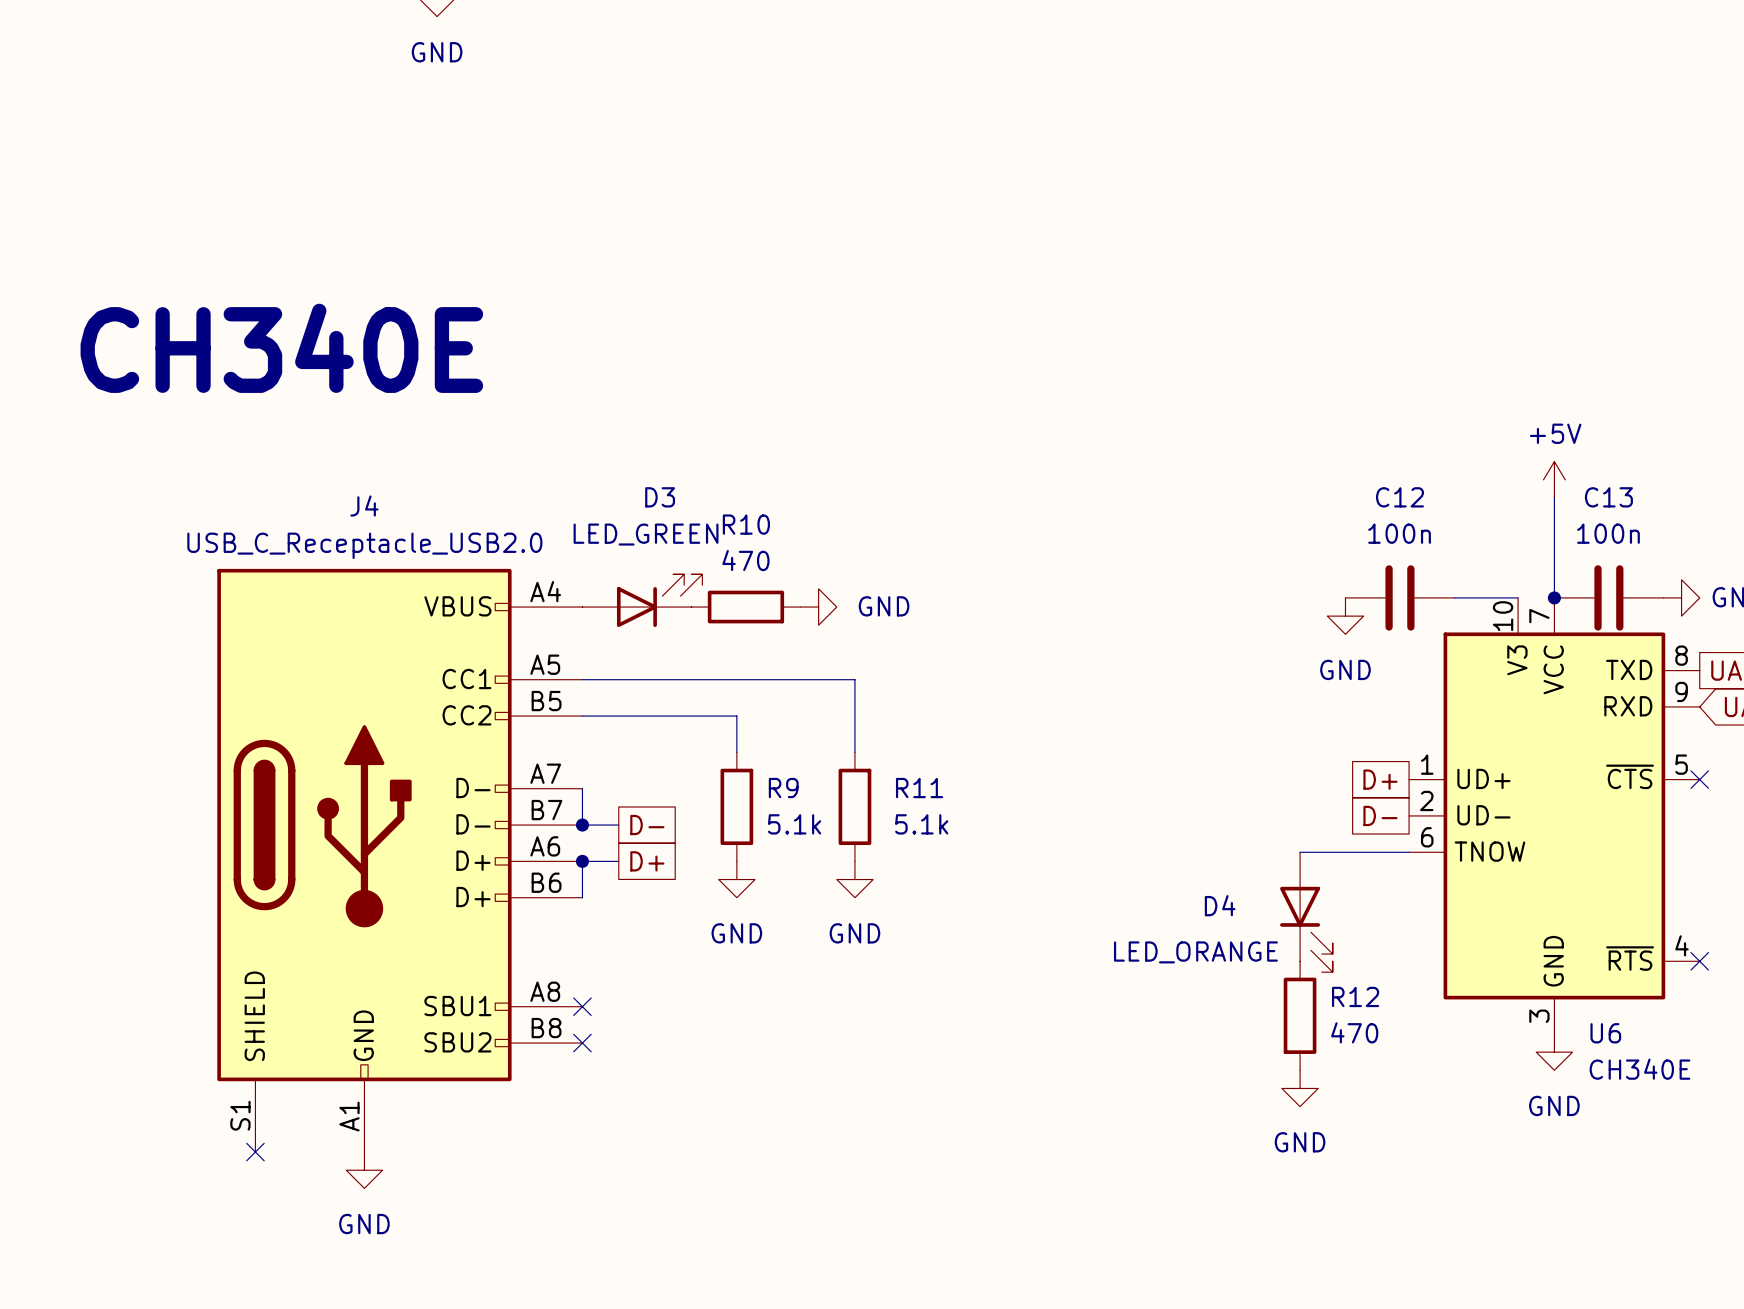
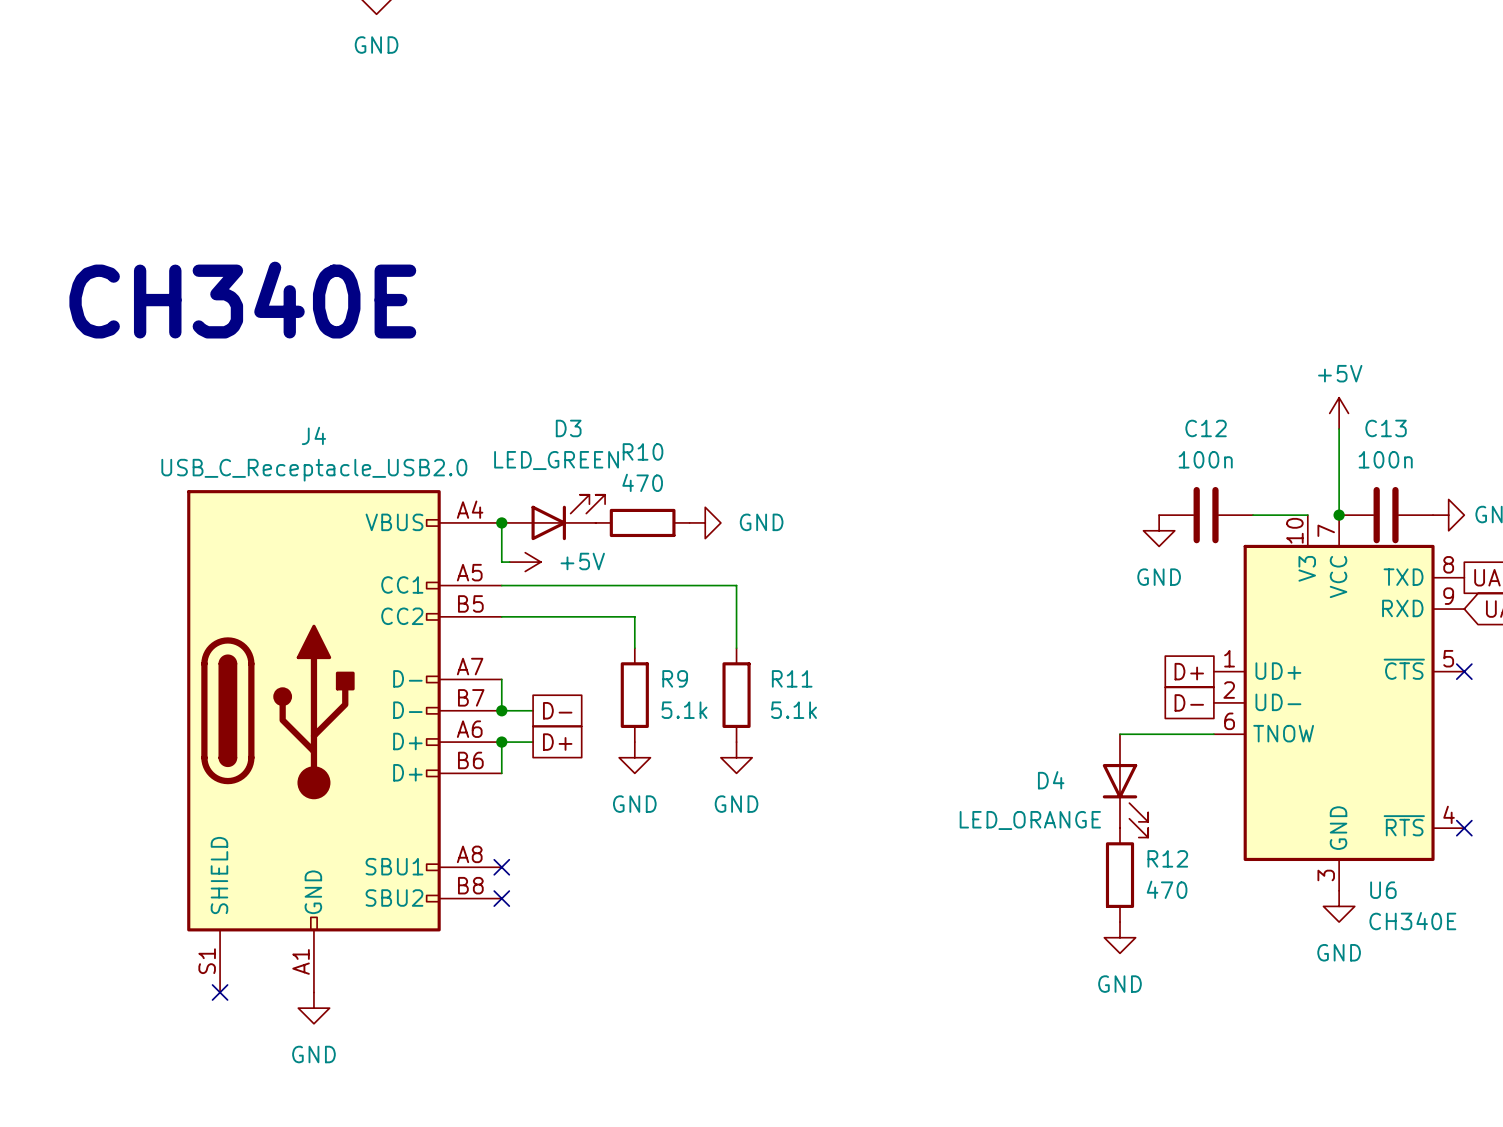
wire: none -> (501, 522) (501, 562) (509, 562)
junction: none -> (501, 522)
power symbol: none -> +5V (525, 562)

